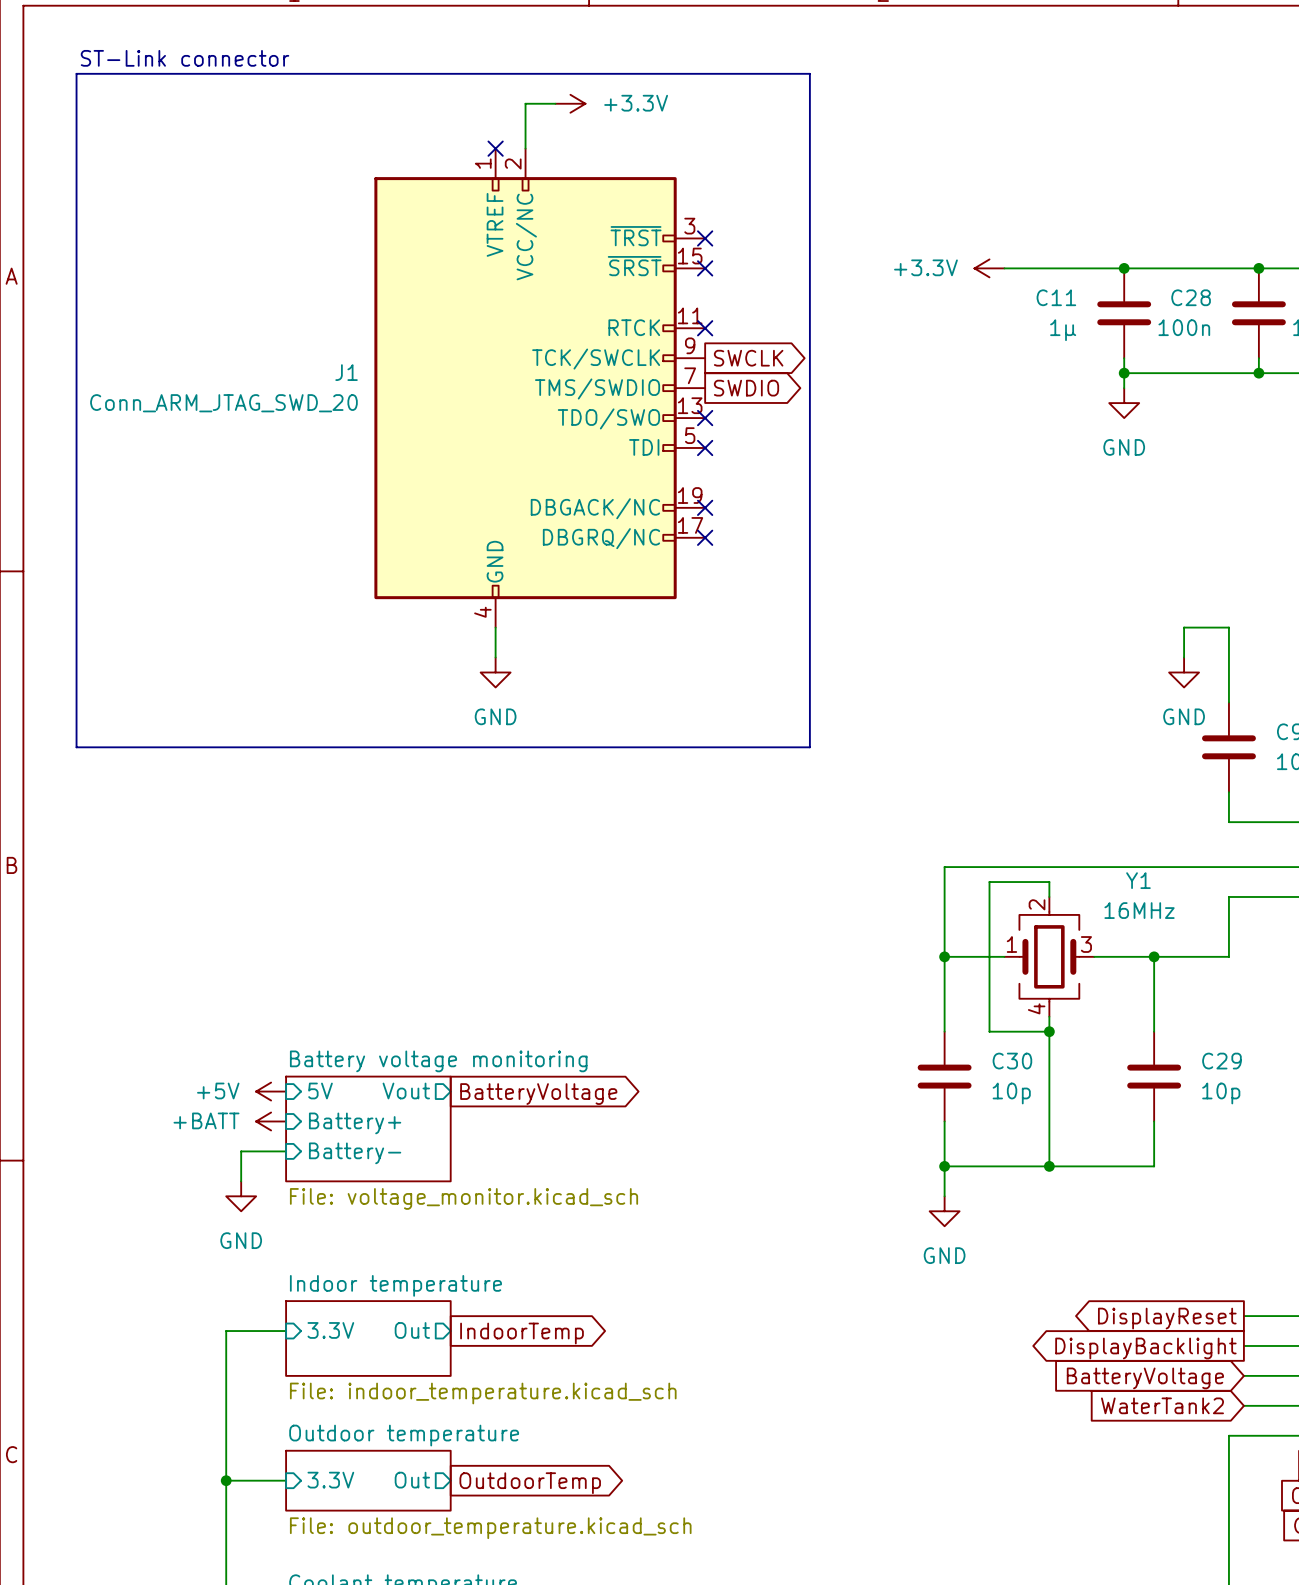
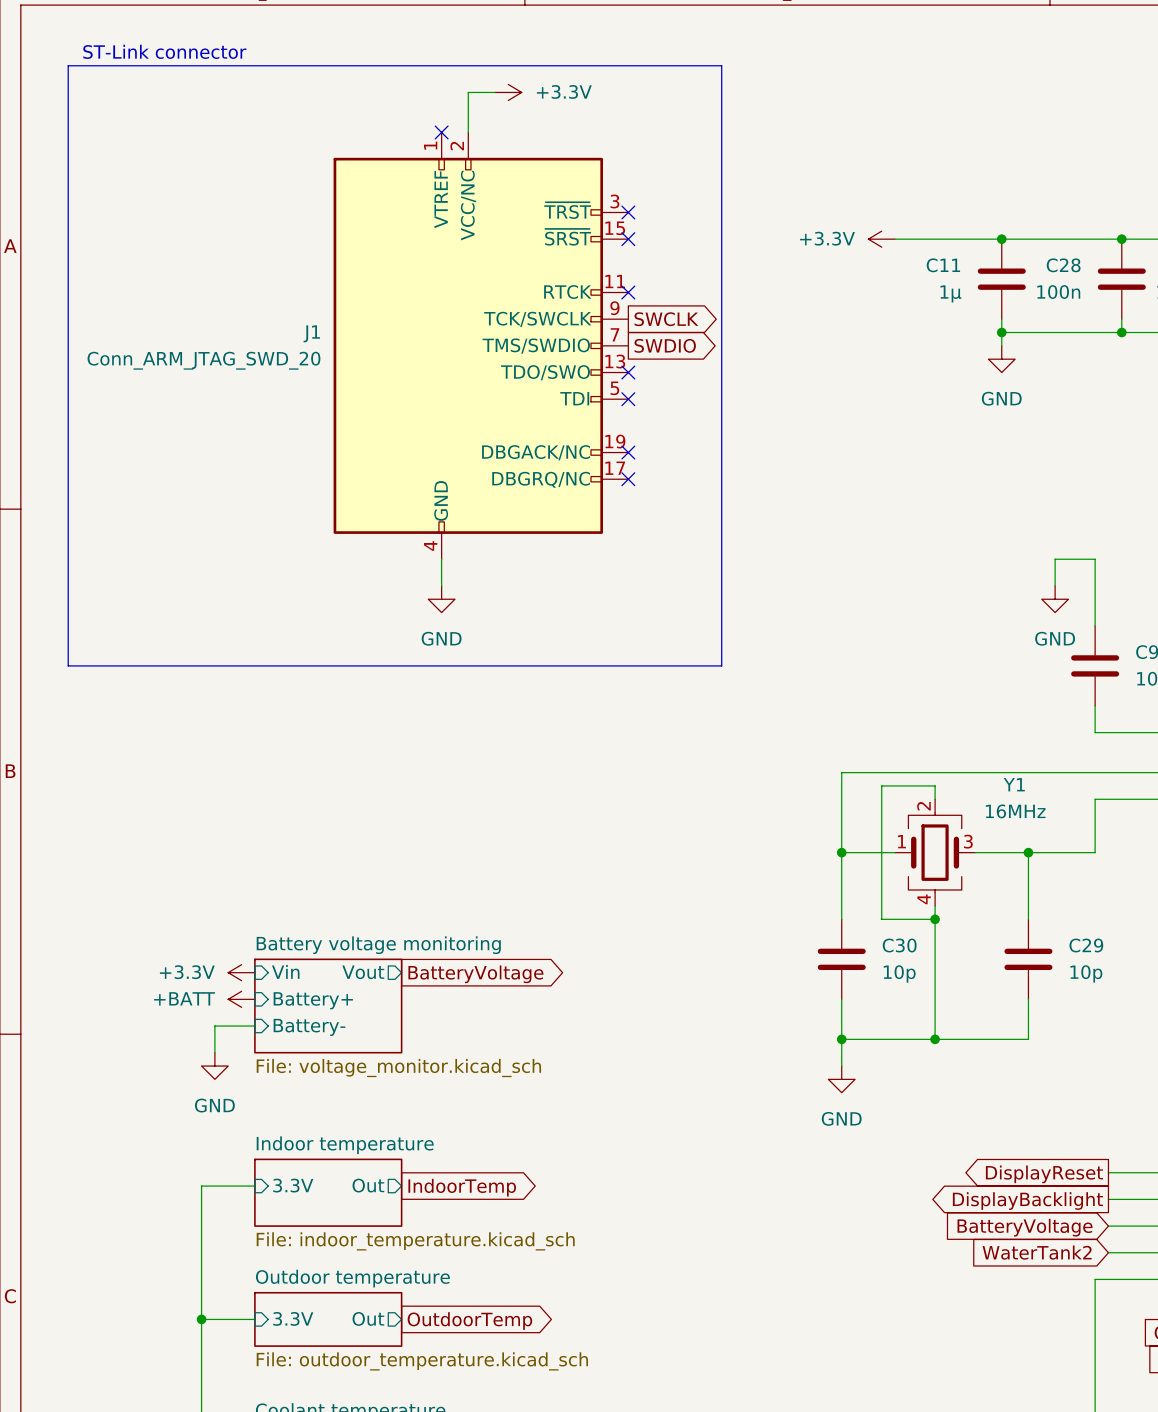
sheet pin: 5V (320, 1090) -> Vin (285, 971)
power symbol: +5V (271, 1091) -> +3.3V (241, 972)

